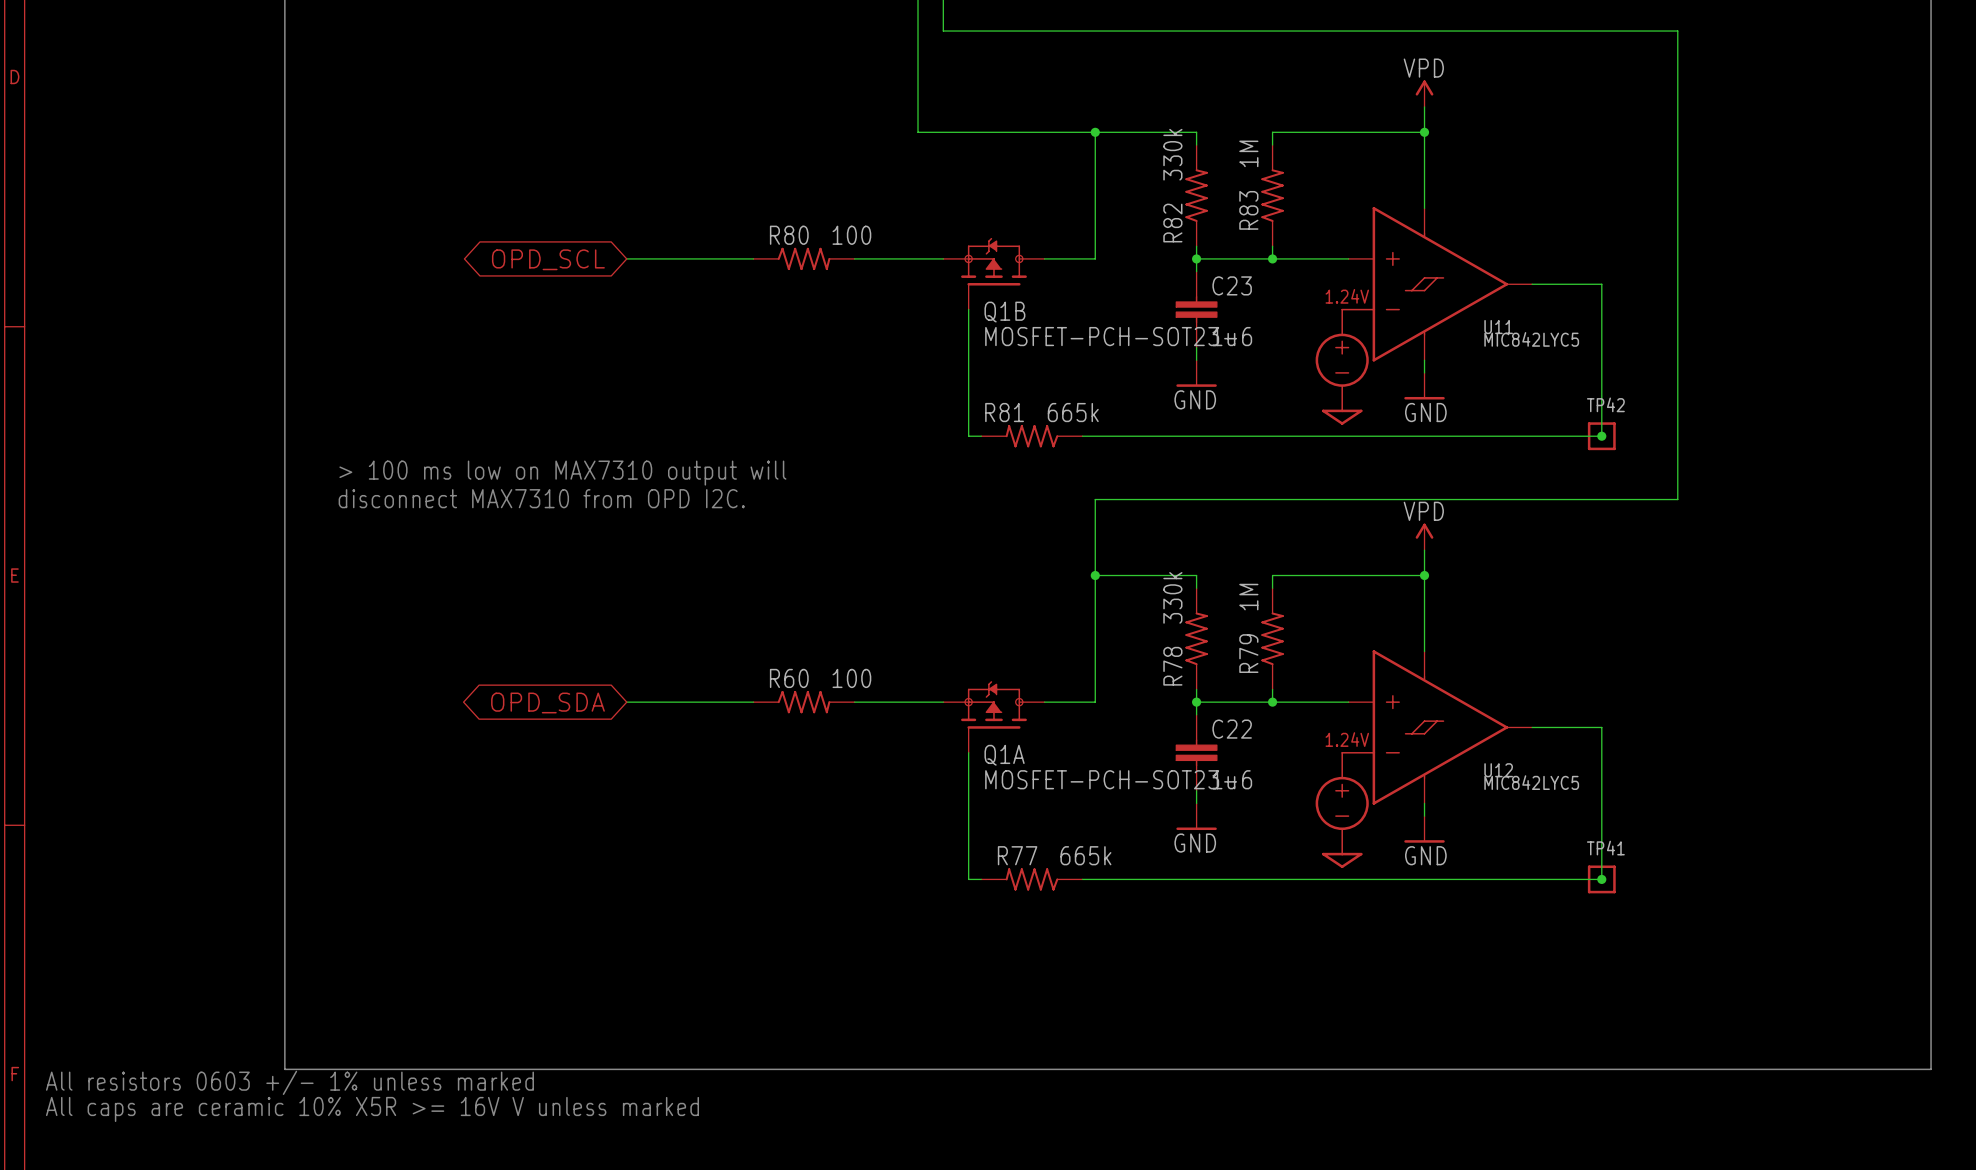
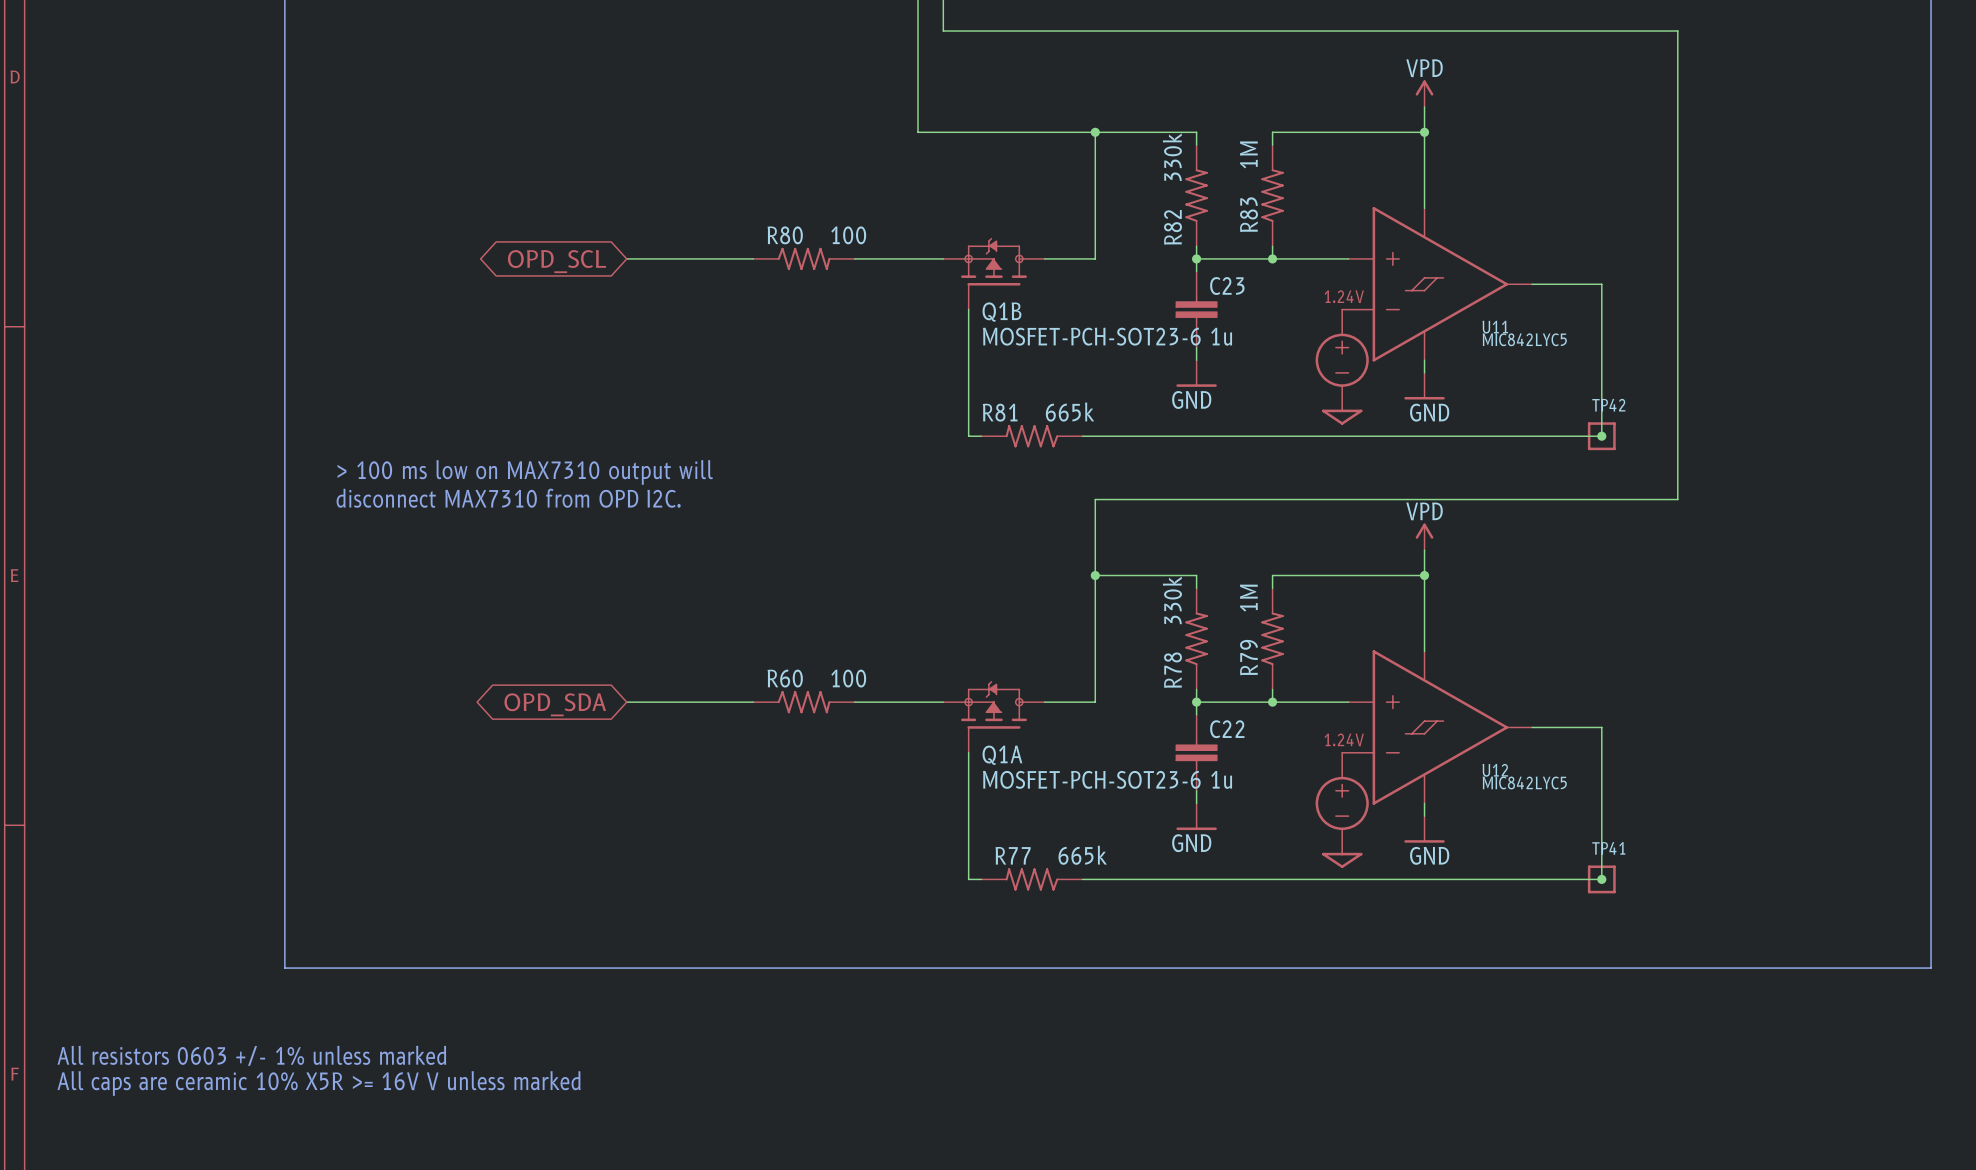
line: (284, 968) (284, 1069) (1931, 1069) (1931, 968) -> (284, 968) (1931, 968)
text position: All resistors 0603 +/- 1% unless marked (289, 1082) -> All resistors 0603 +/- 1% unless marked (251, 1055)
text position: All caps are ceramic 10% X5R >= 16V V unless marked (372, 1109) -> All caps are ceramic 10% X5R >= 16V V unless marked (319, 1083)

